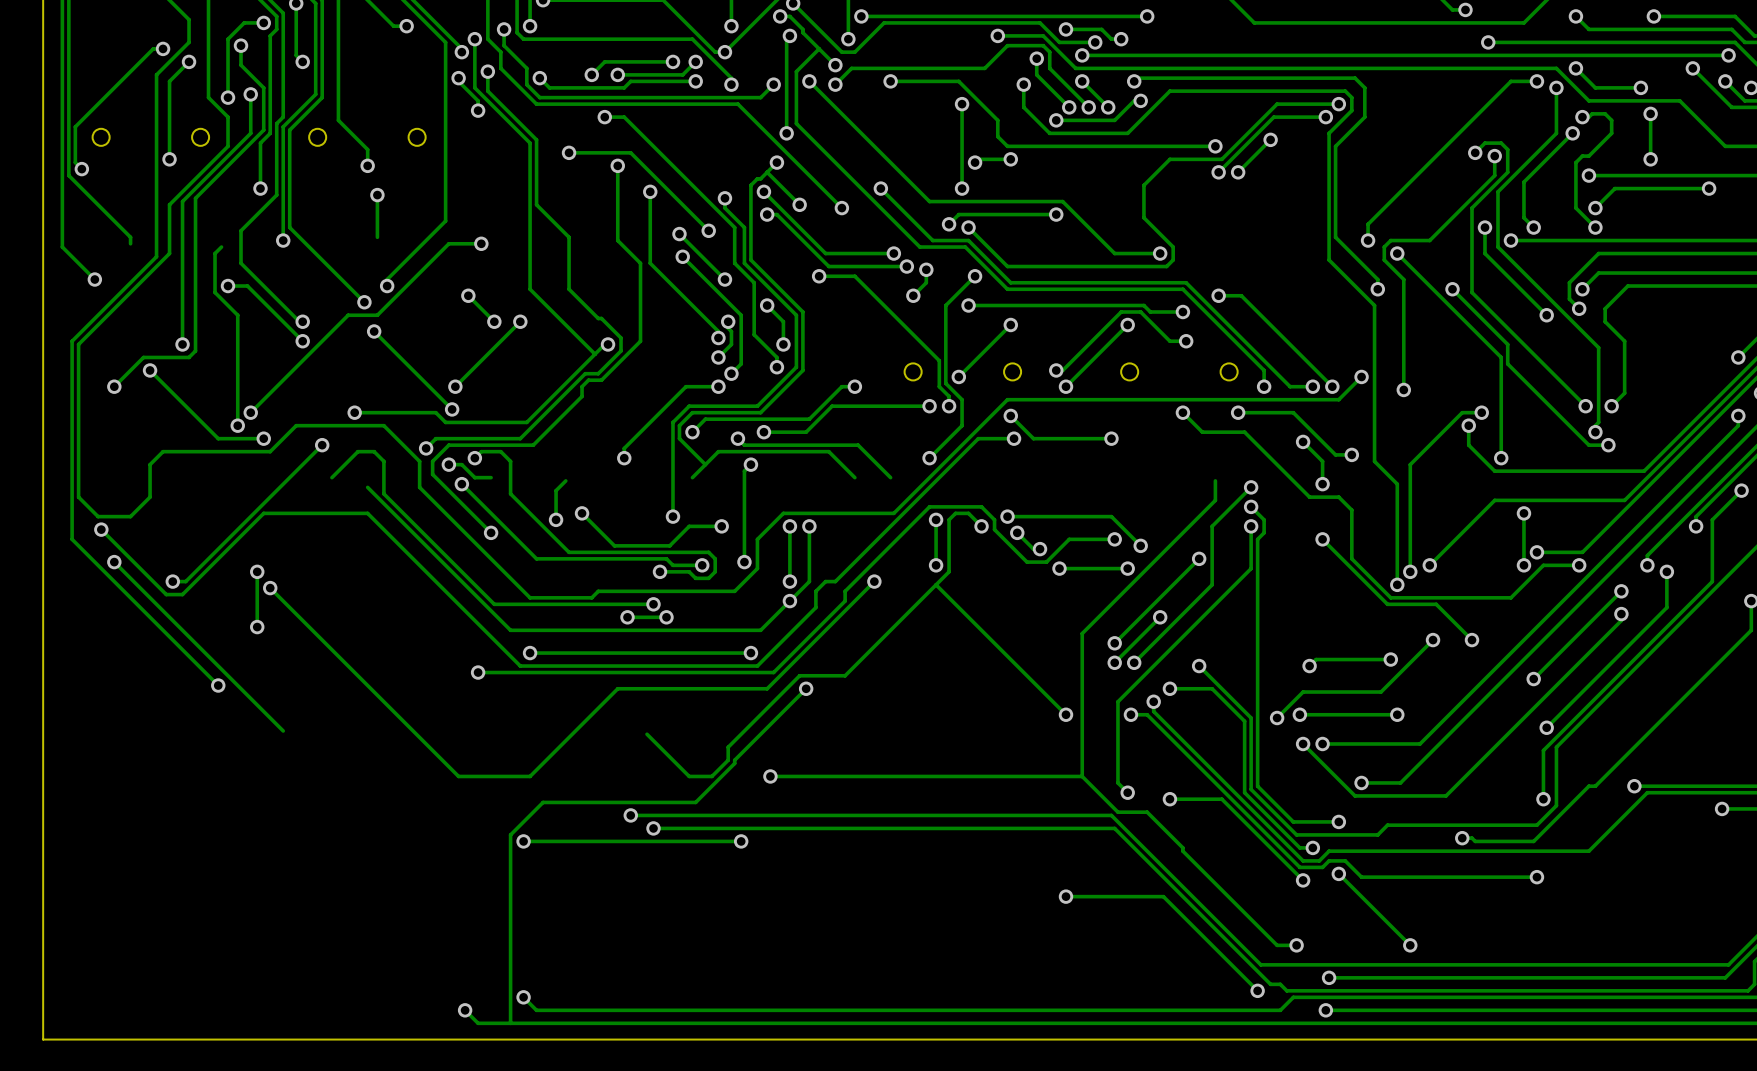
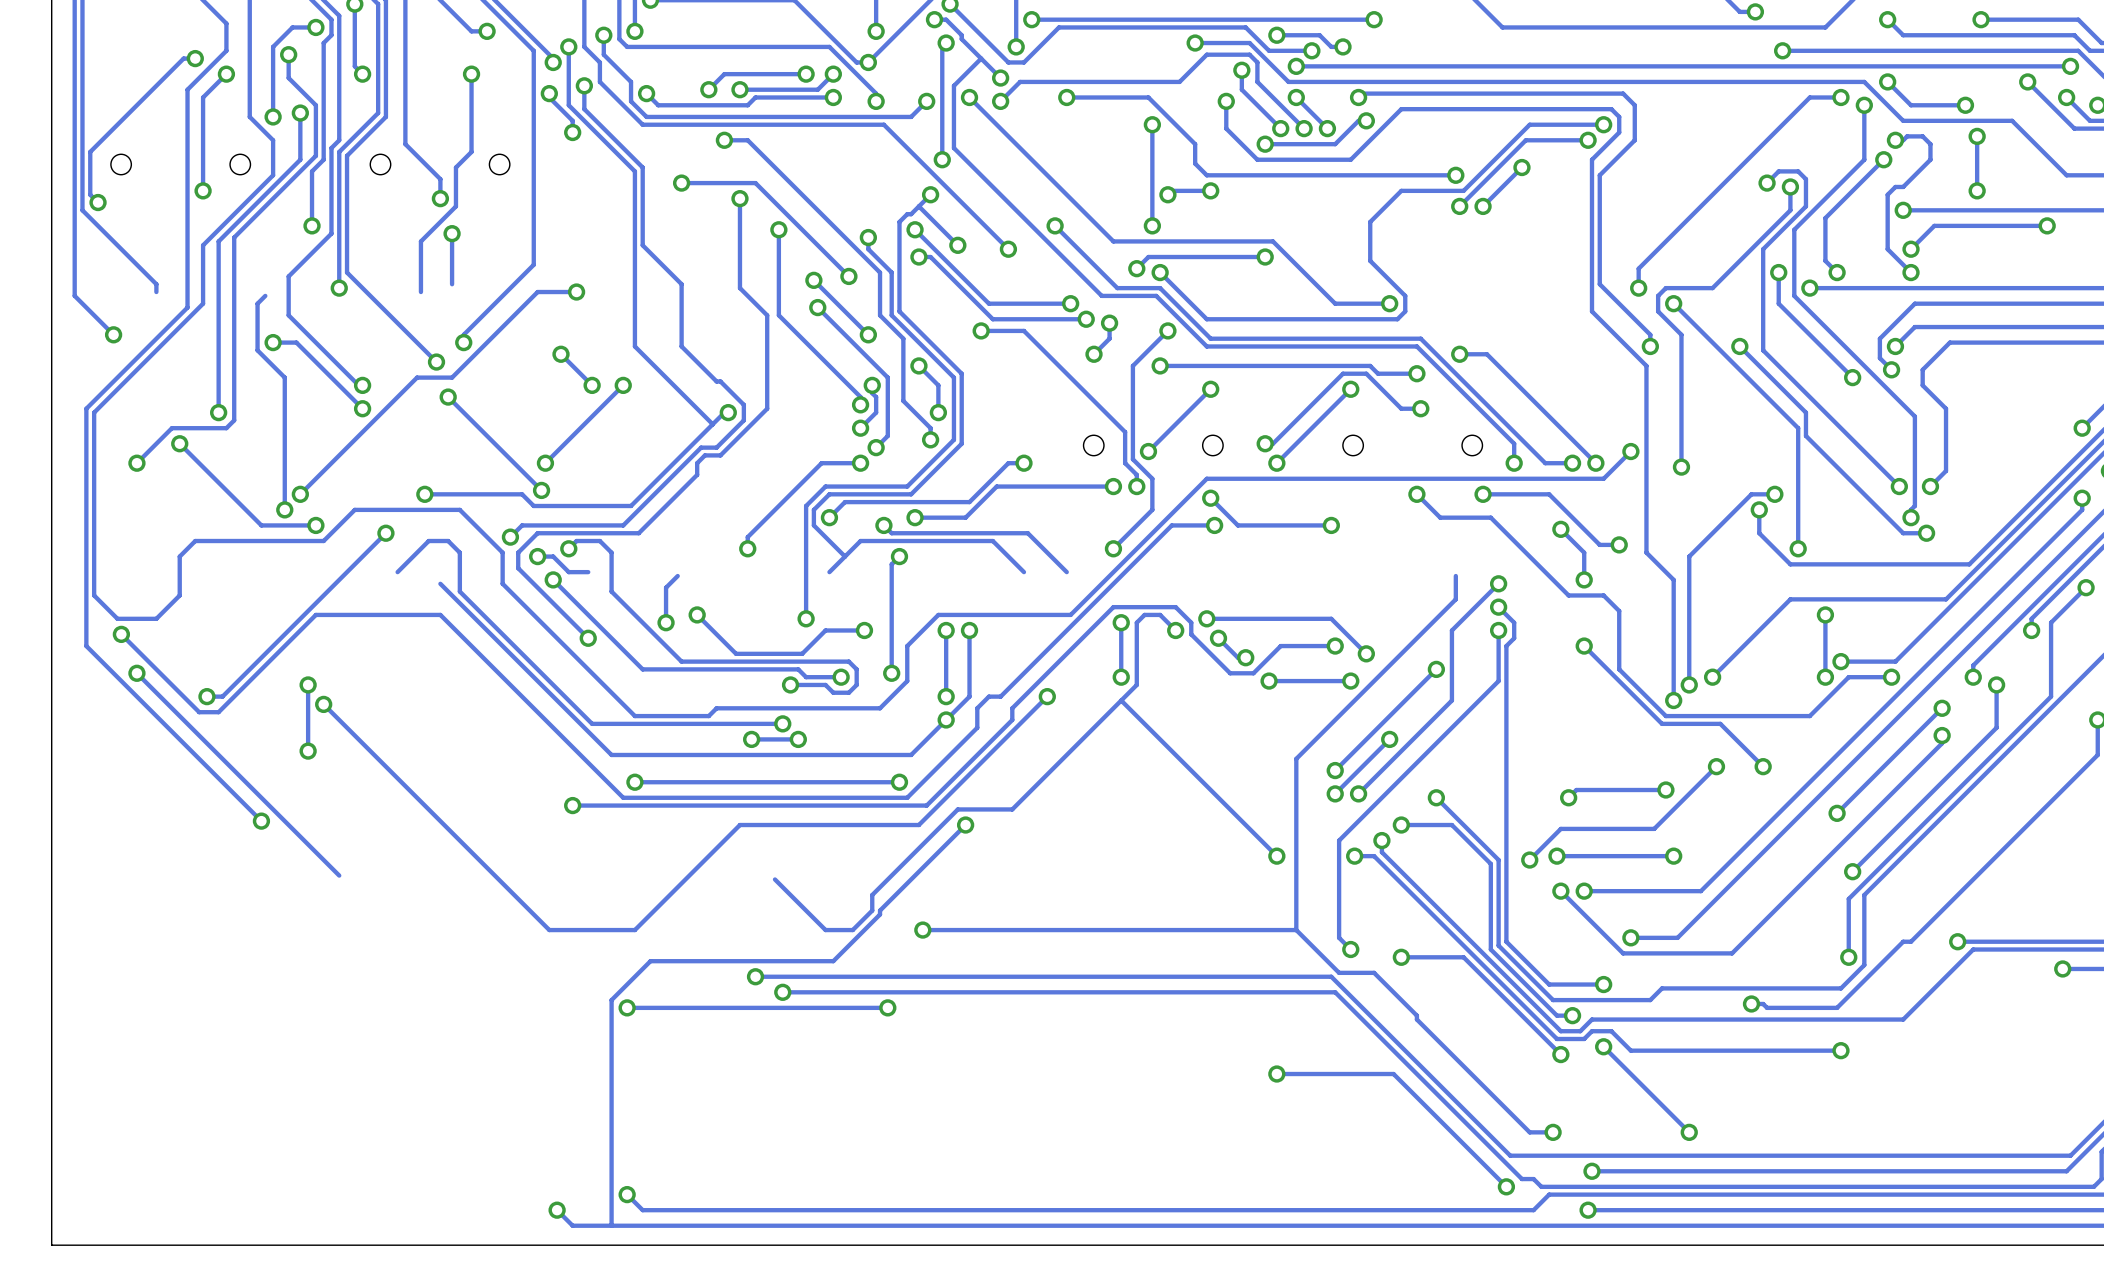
track: none -> (471, 74) (471, 151) (455, 167) (455, 206) (420, 241) (420, 292)
via: none -> (471, 74)

